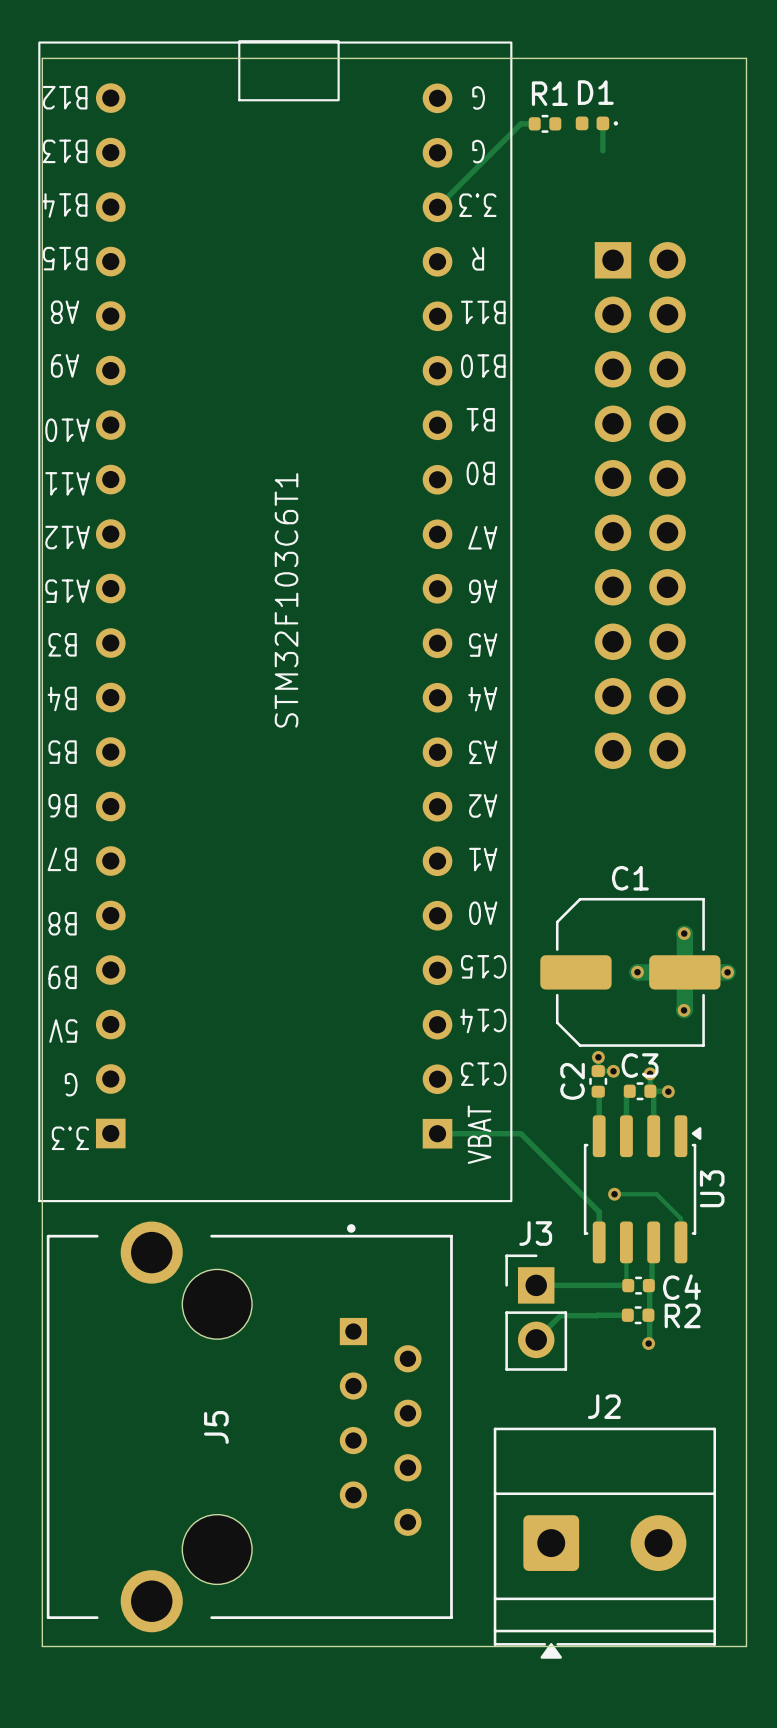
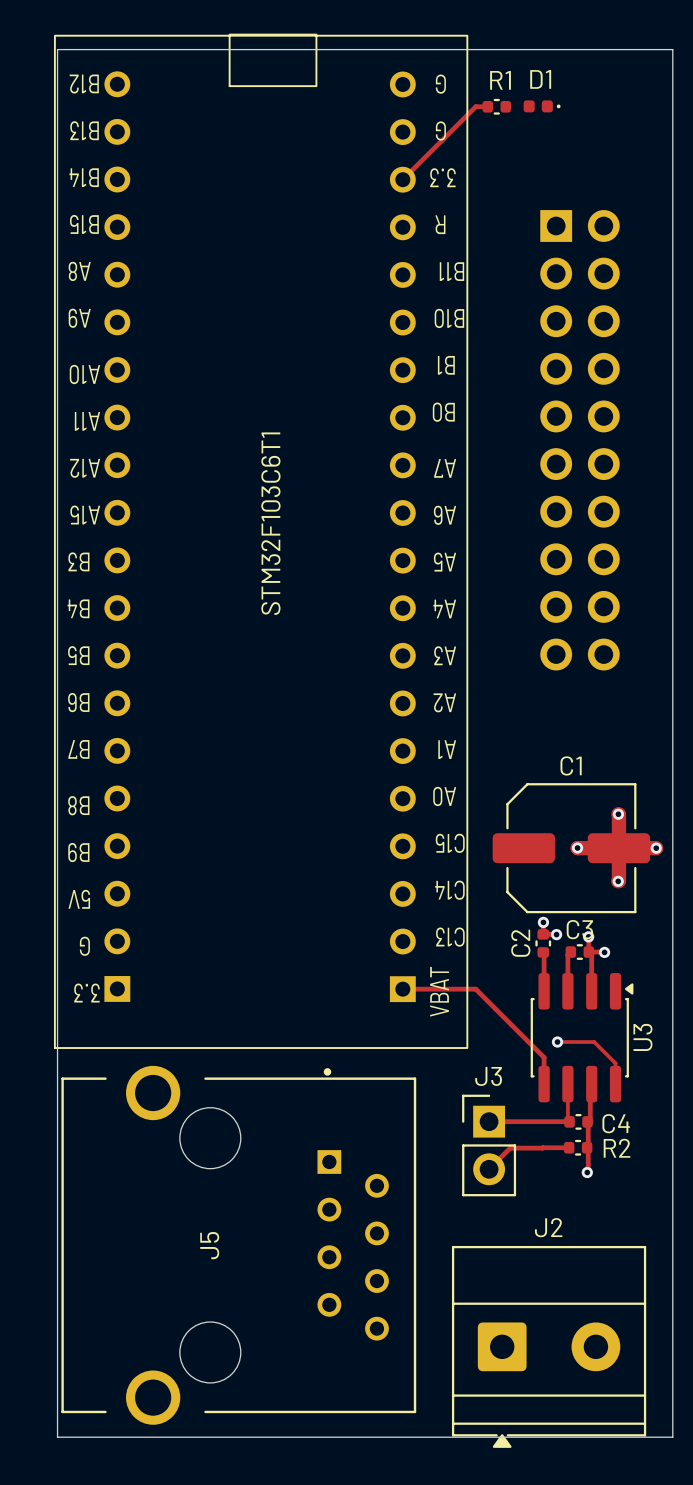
track: (602, 123) (602, 150) -> none

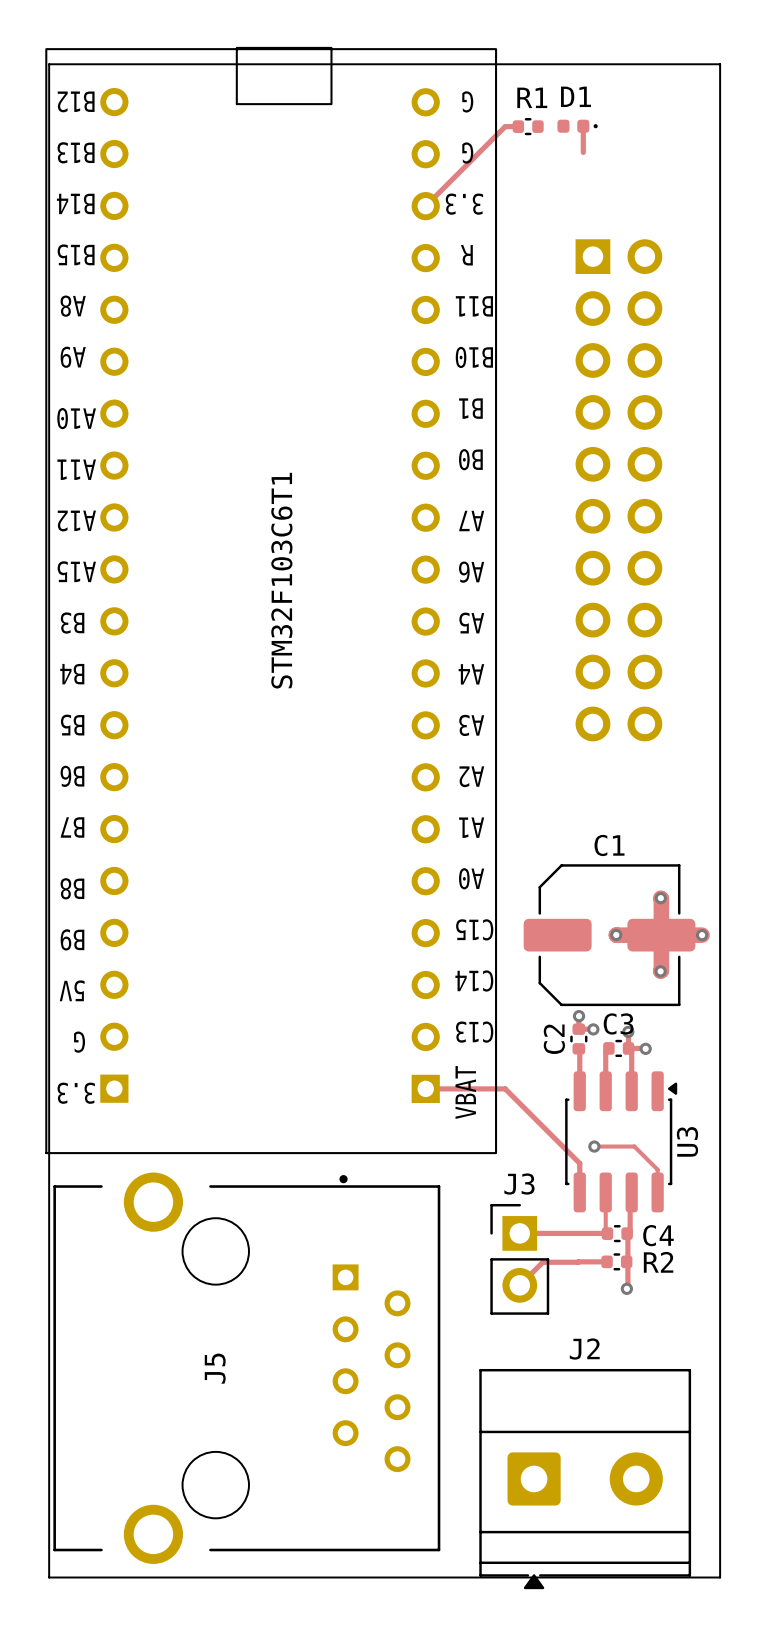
track: none -> (583, 126) (583, 152)

